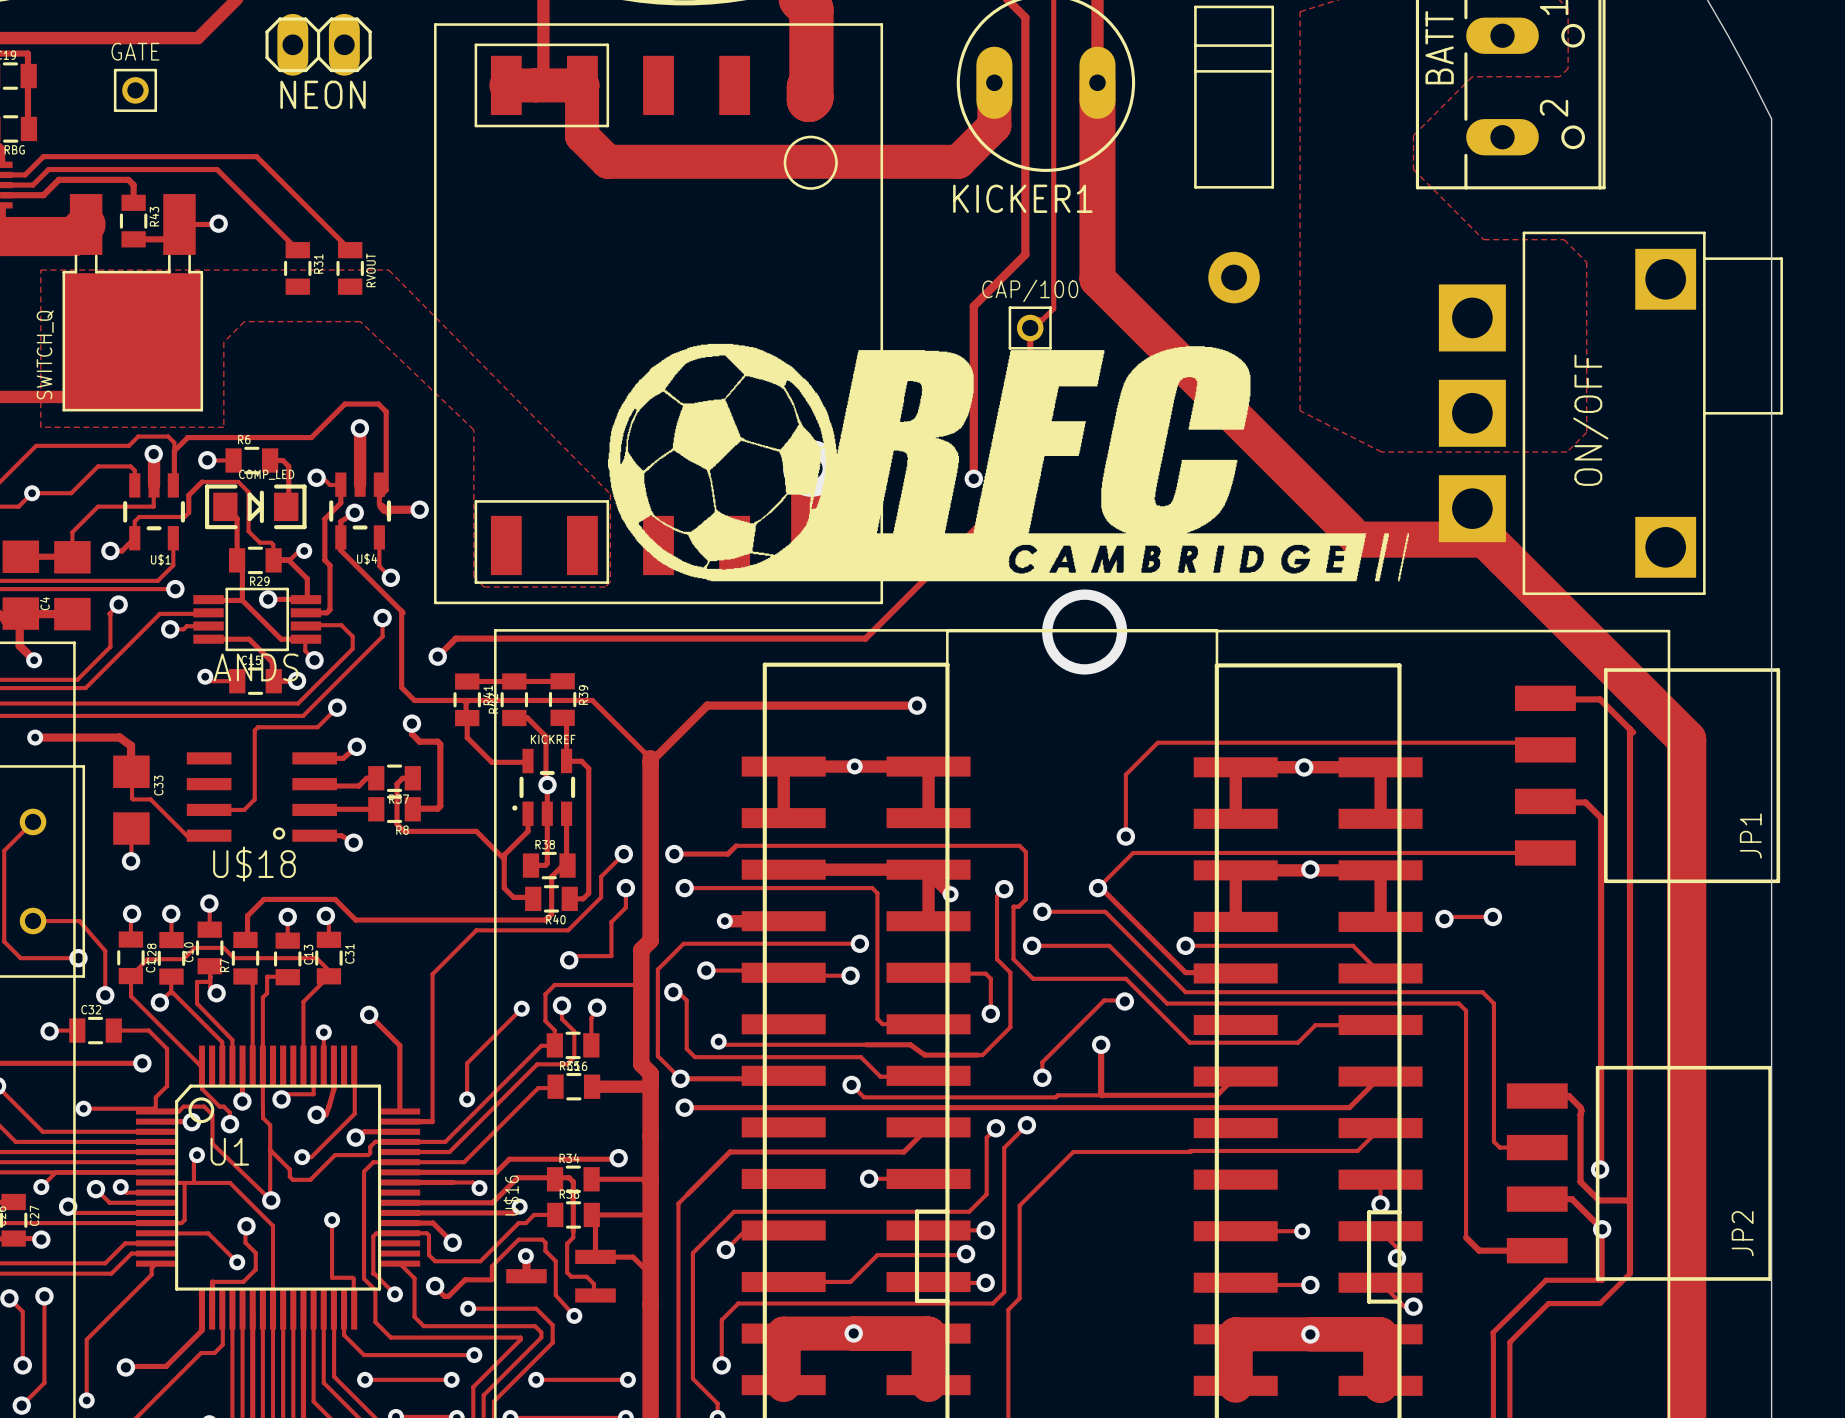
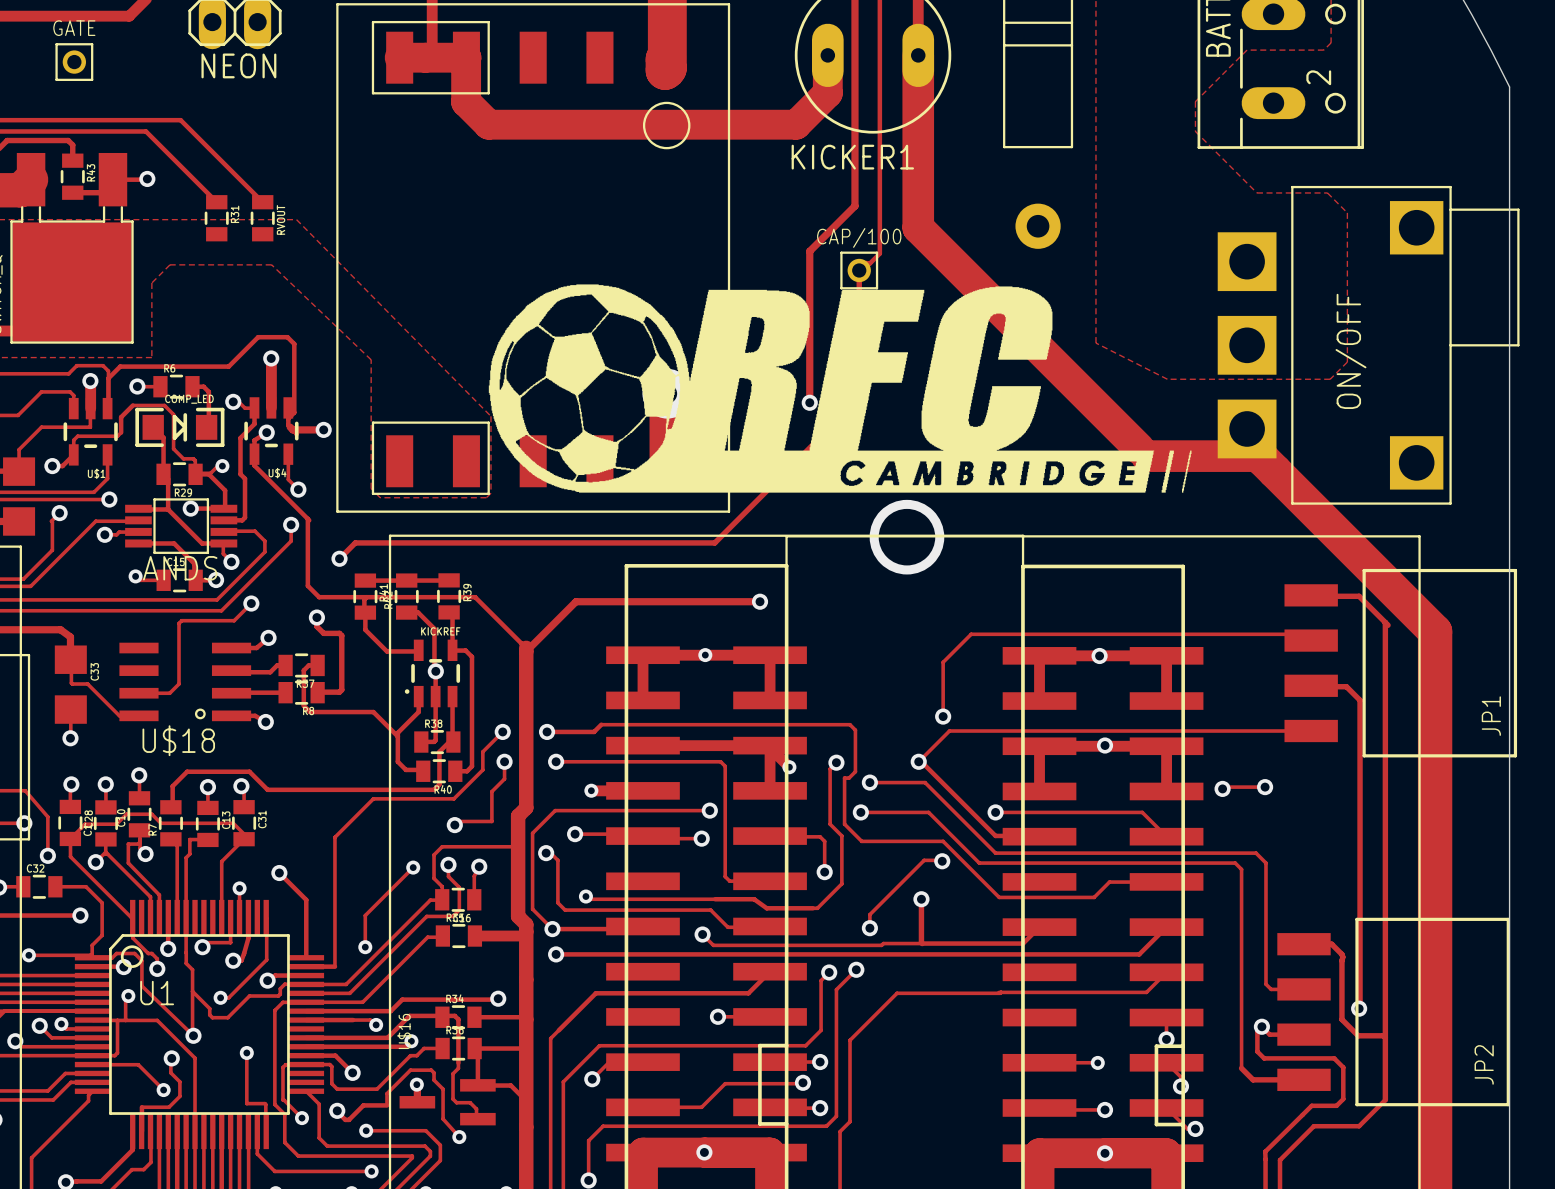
track: (1537, 1199) (1571, 1199) (1602, 1229) (1602, 1280) (1574, 1280) -> (1304, 1034) (1269, 1034) (1261, 1026) (1257, 1031) (1257, 1051) (1264, 1058) (1334, 1058) (1343, 1067) (1343, 1099) (1336, 1105)
via position: (1602, 1229) -> (1261, 1026)

